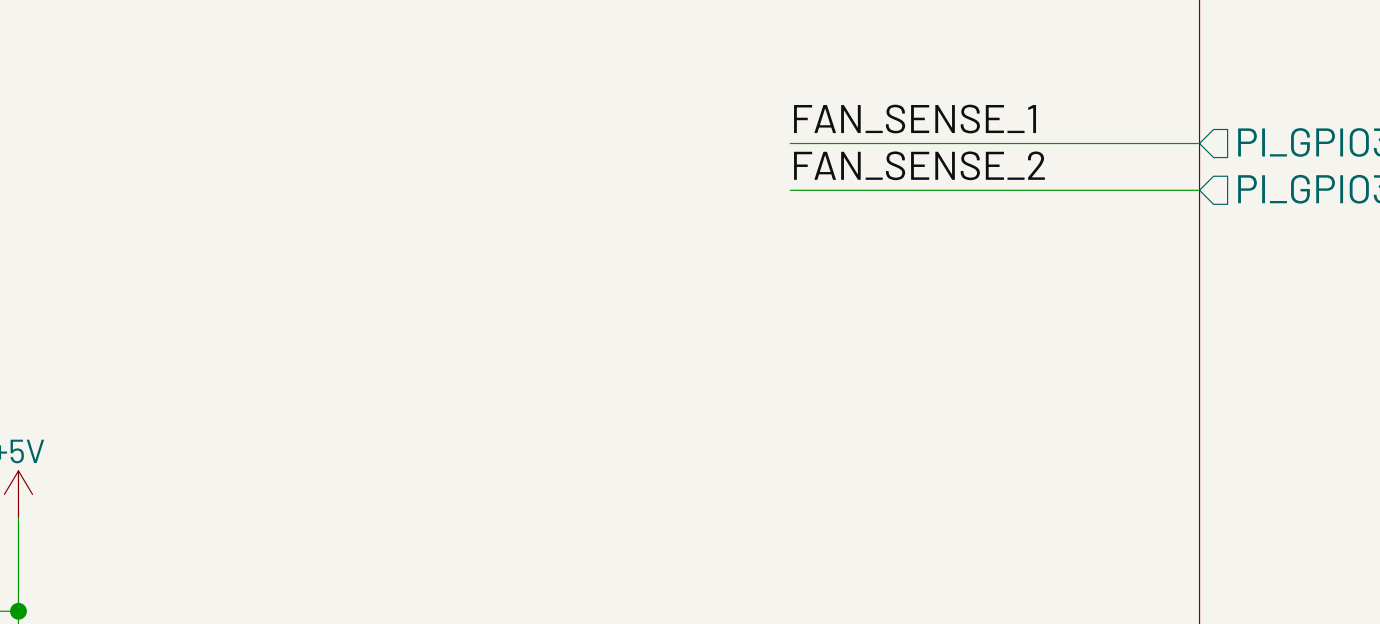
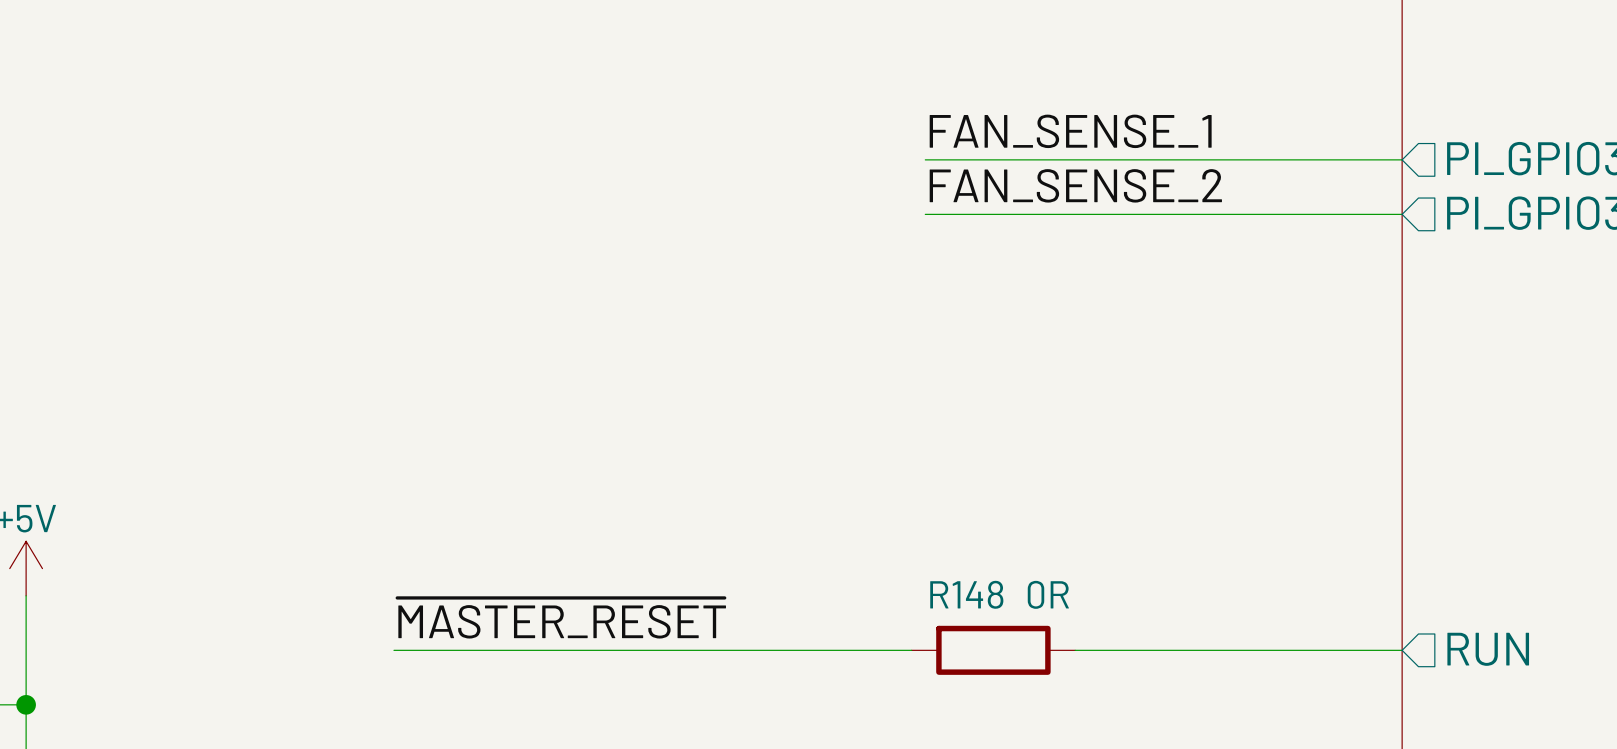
label: none -> ~{MASTER_RESET} (561, 618)
sheet pin: none -> RUN (1488, 649)
wire: none -> (393, 650) (911, 650)
R148: none -> 0R (993, 650)
wire: none -> (1075, 650) (1402, 650)

